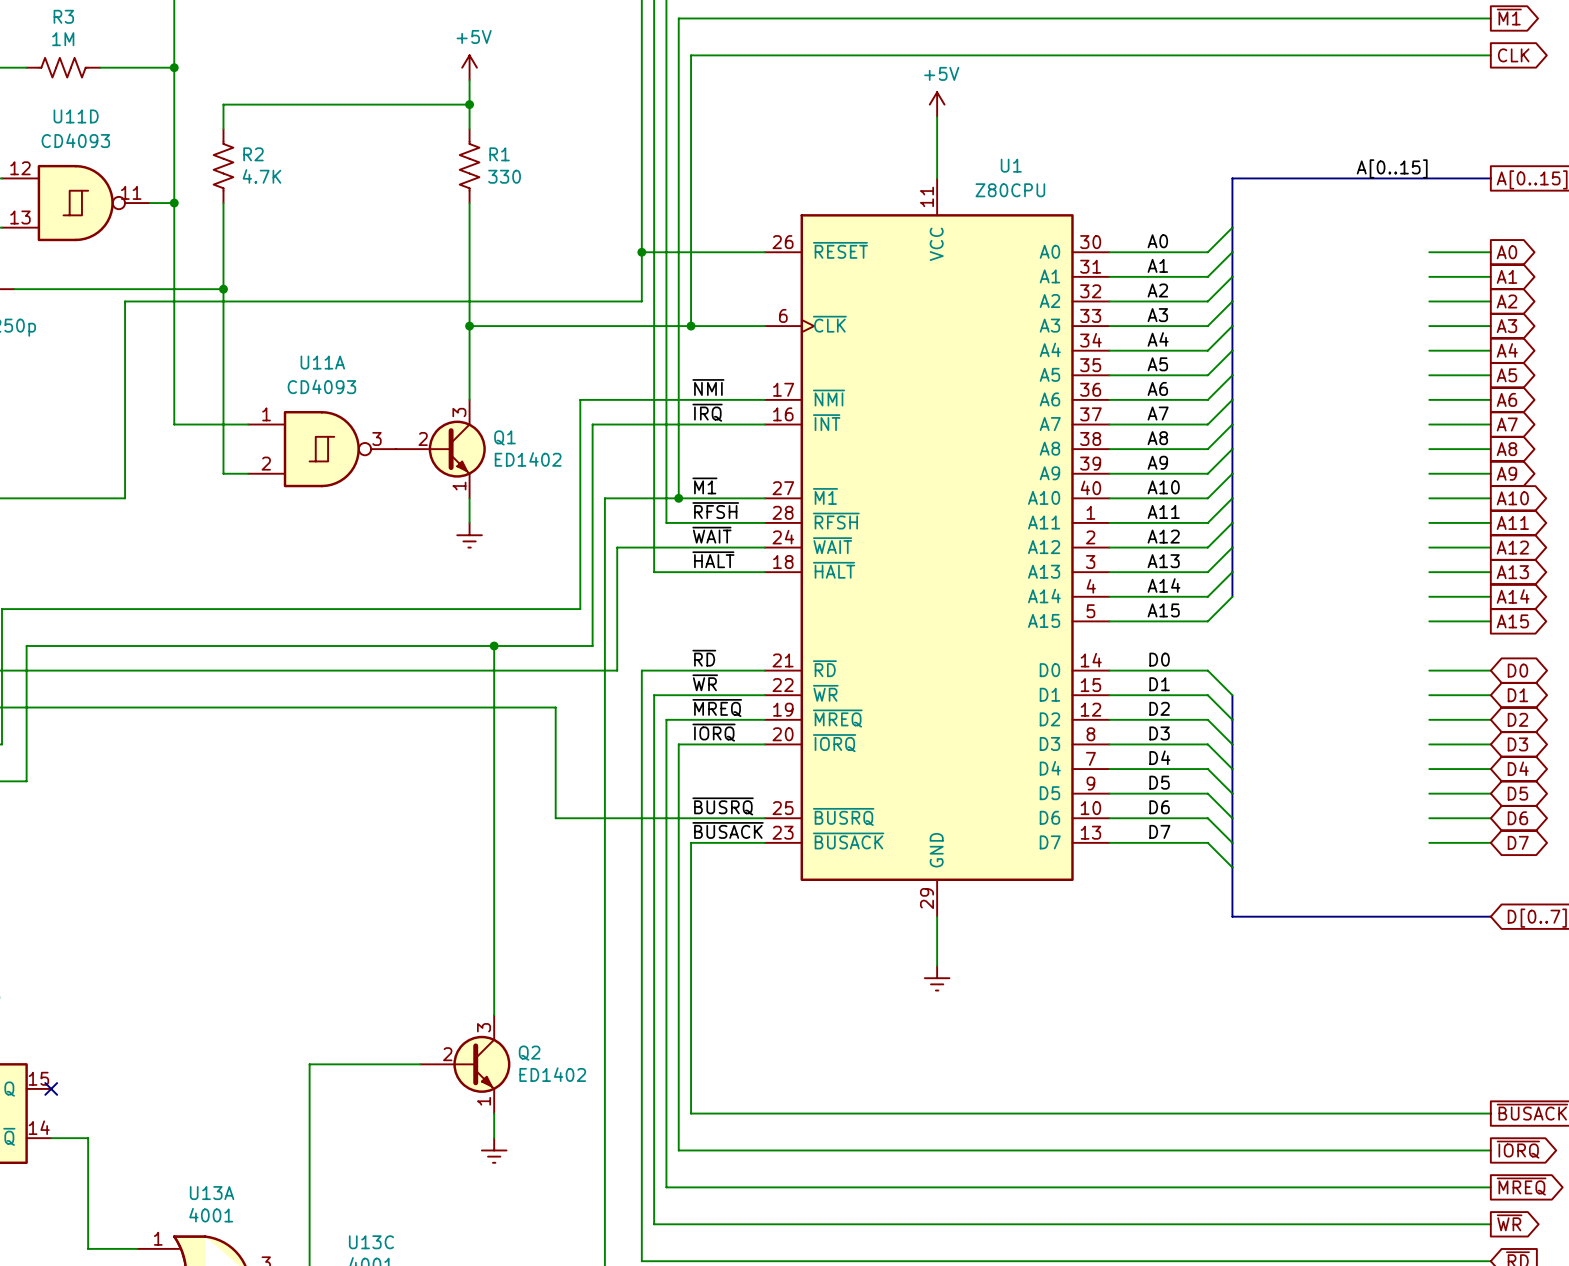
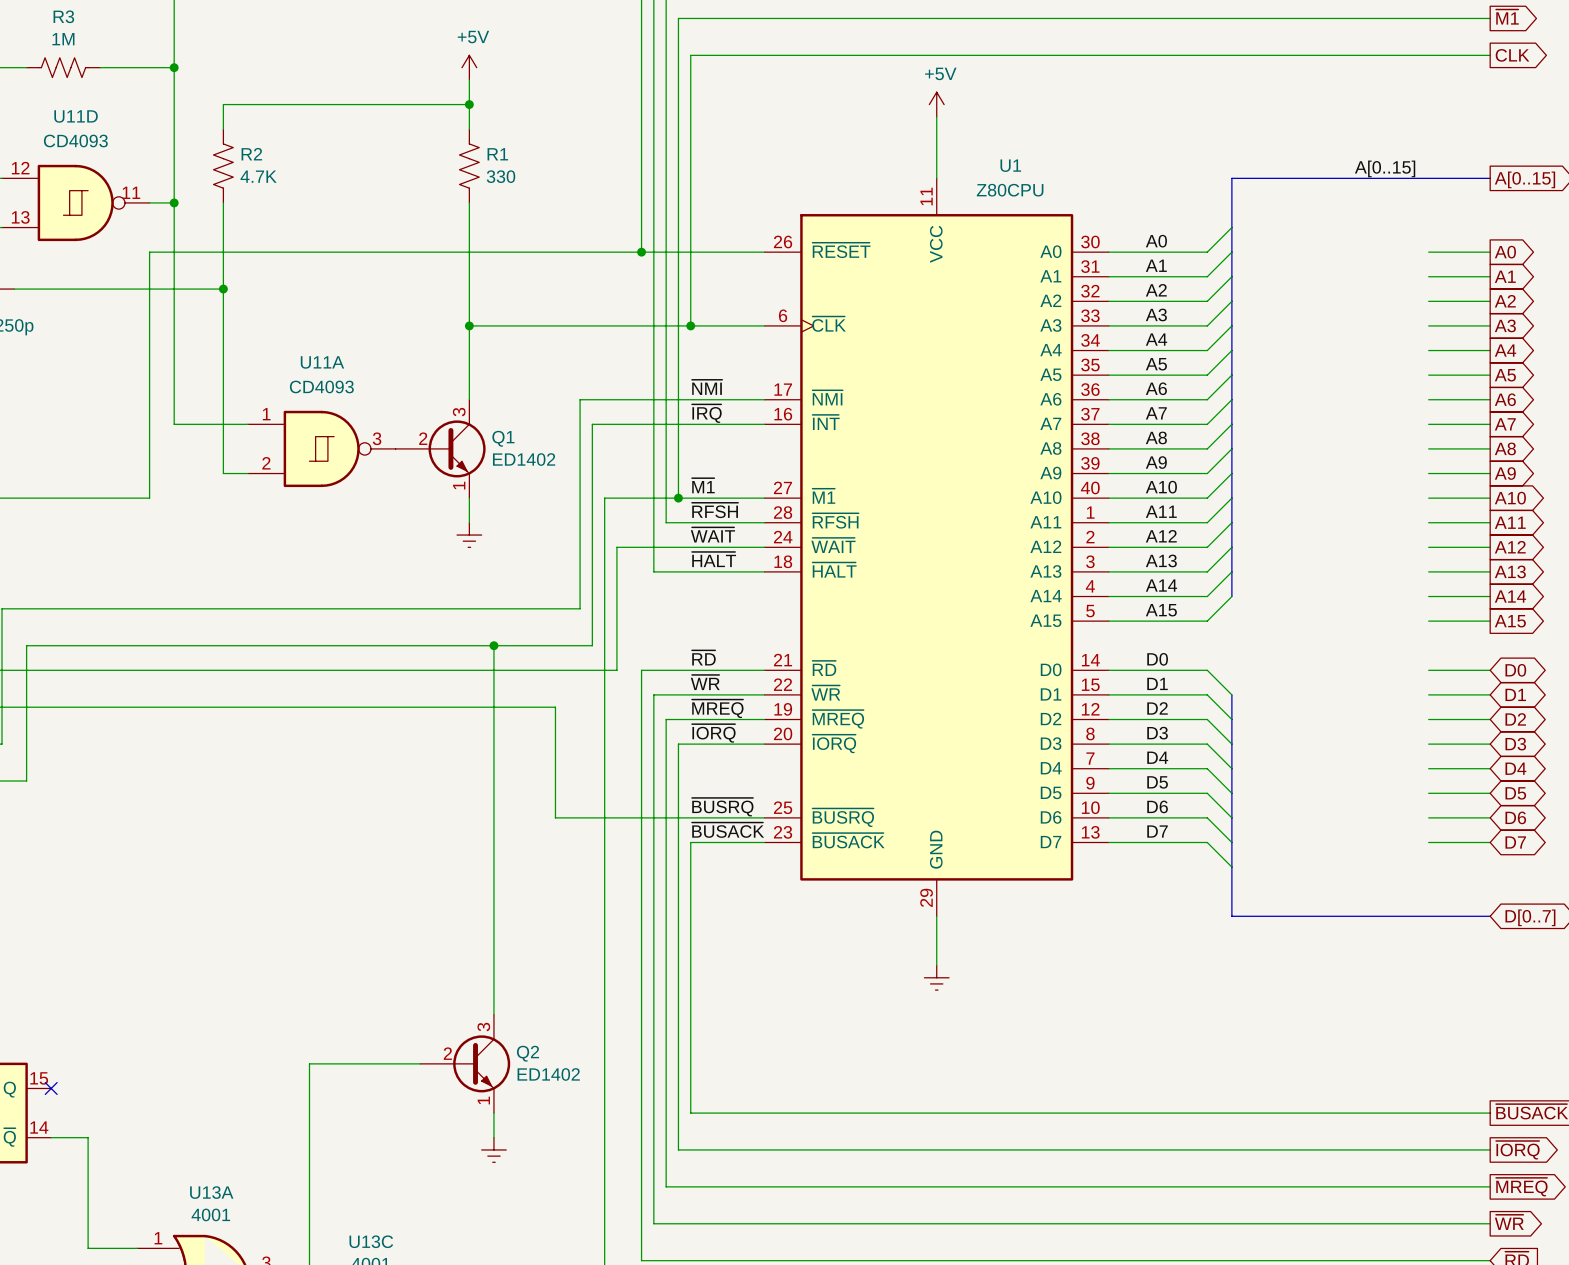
wire: (641, 252) (641, 301) (125, 301) (125, 498) -> (641, 252) (149, 252) (149, 498) (124, 498)
Q1 symbol: [395, 399, 486, 499] -> [395, 399, 486, 499]
Q2 symbol: [420, 1015, 511, 1114] -> [420, 1014, 511, 1114]

